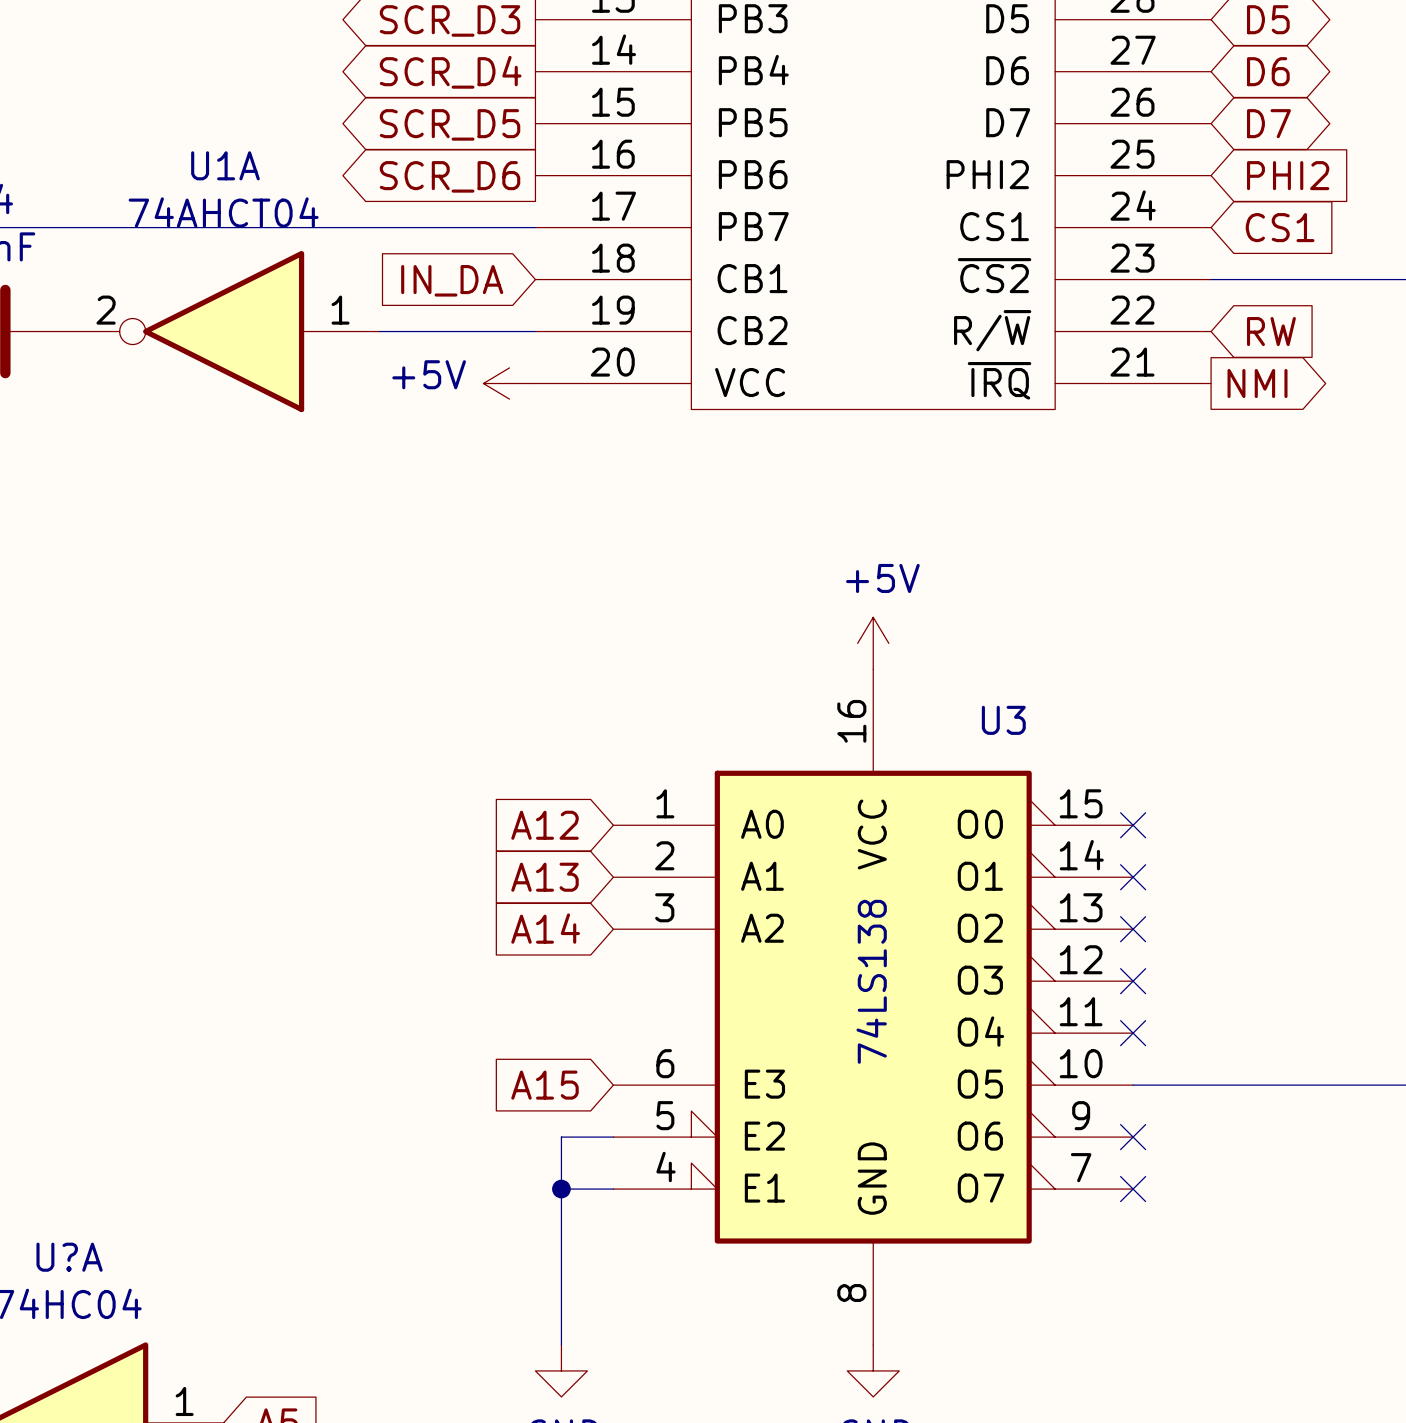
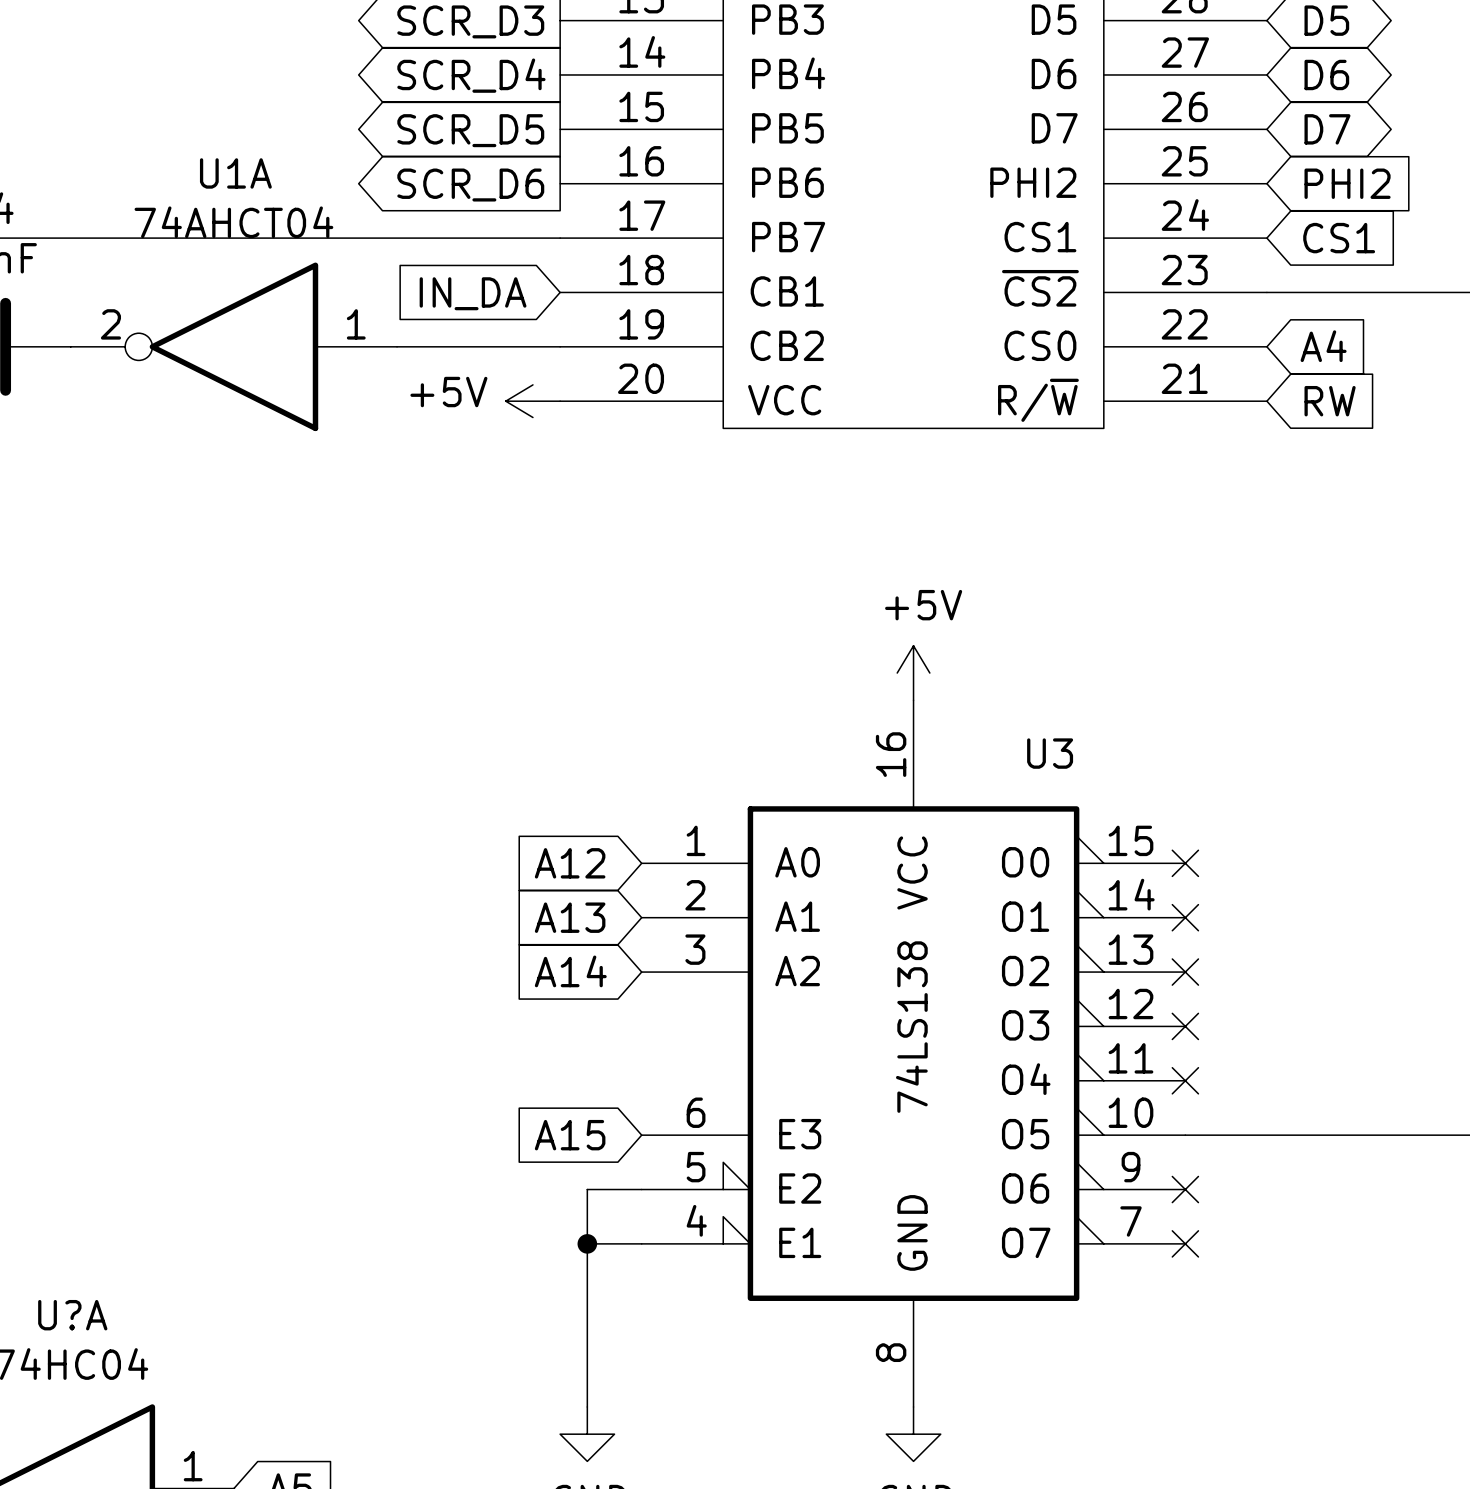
part pin name: R/~{W} (992, 330) -> CS0 (1040, 345)
global label: RW (1271, 331) -> A4 (1323, 346)
part pin name: ~{IRQ} (999, 380) -> R/~{W} (1038, 400)
global label shape: output (1257, 383) -> input (1330, 401)
global label: NMI (1257, 383) -> RW (1330, 401)

